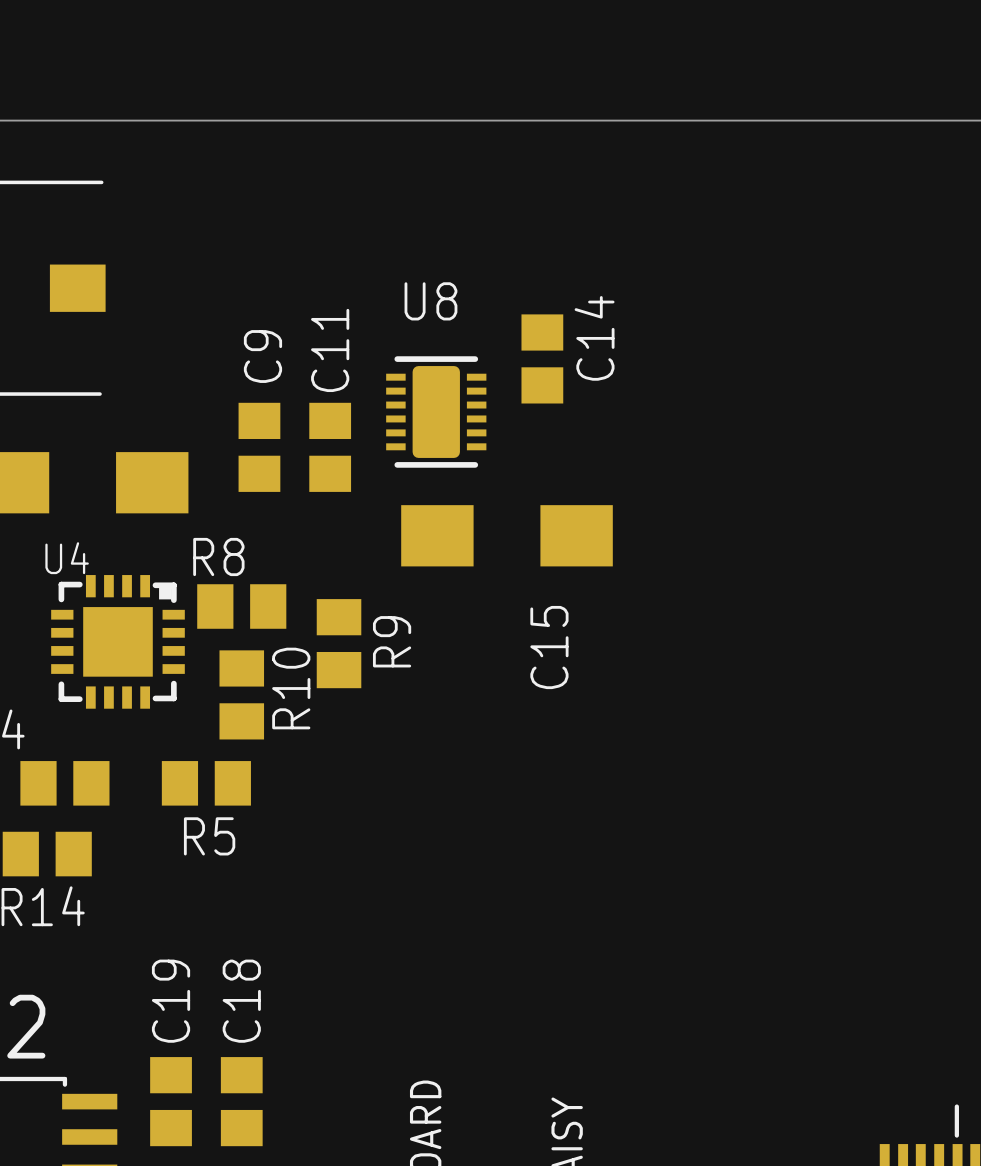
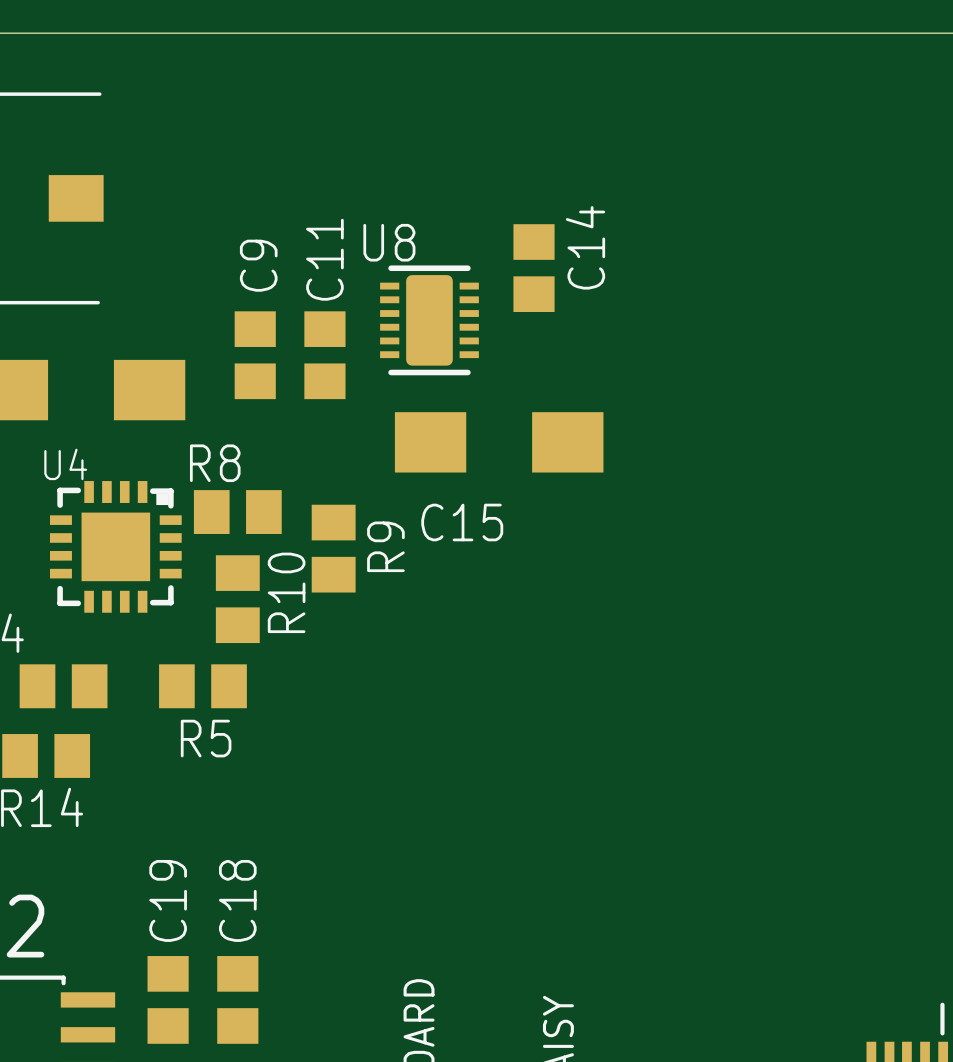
U8 name position: U8 (430, 301) -> U8 (389, 242)
C15 name rotation: 0° (549, 647) -> 90° clockwise (462, 522)

